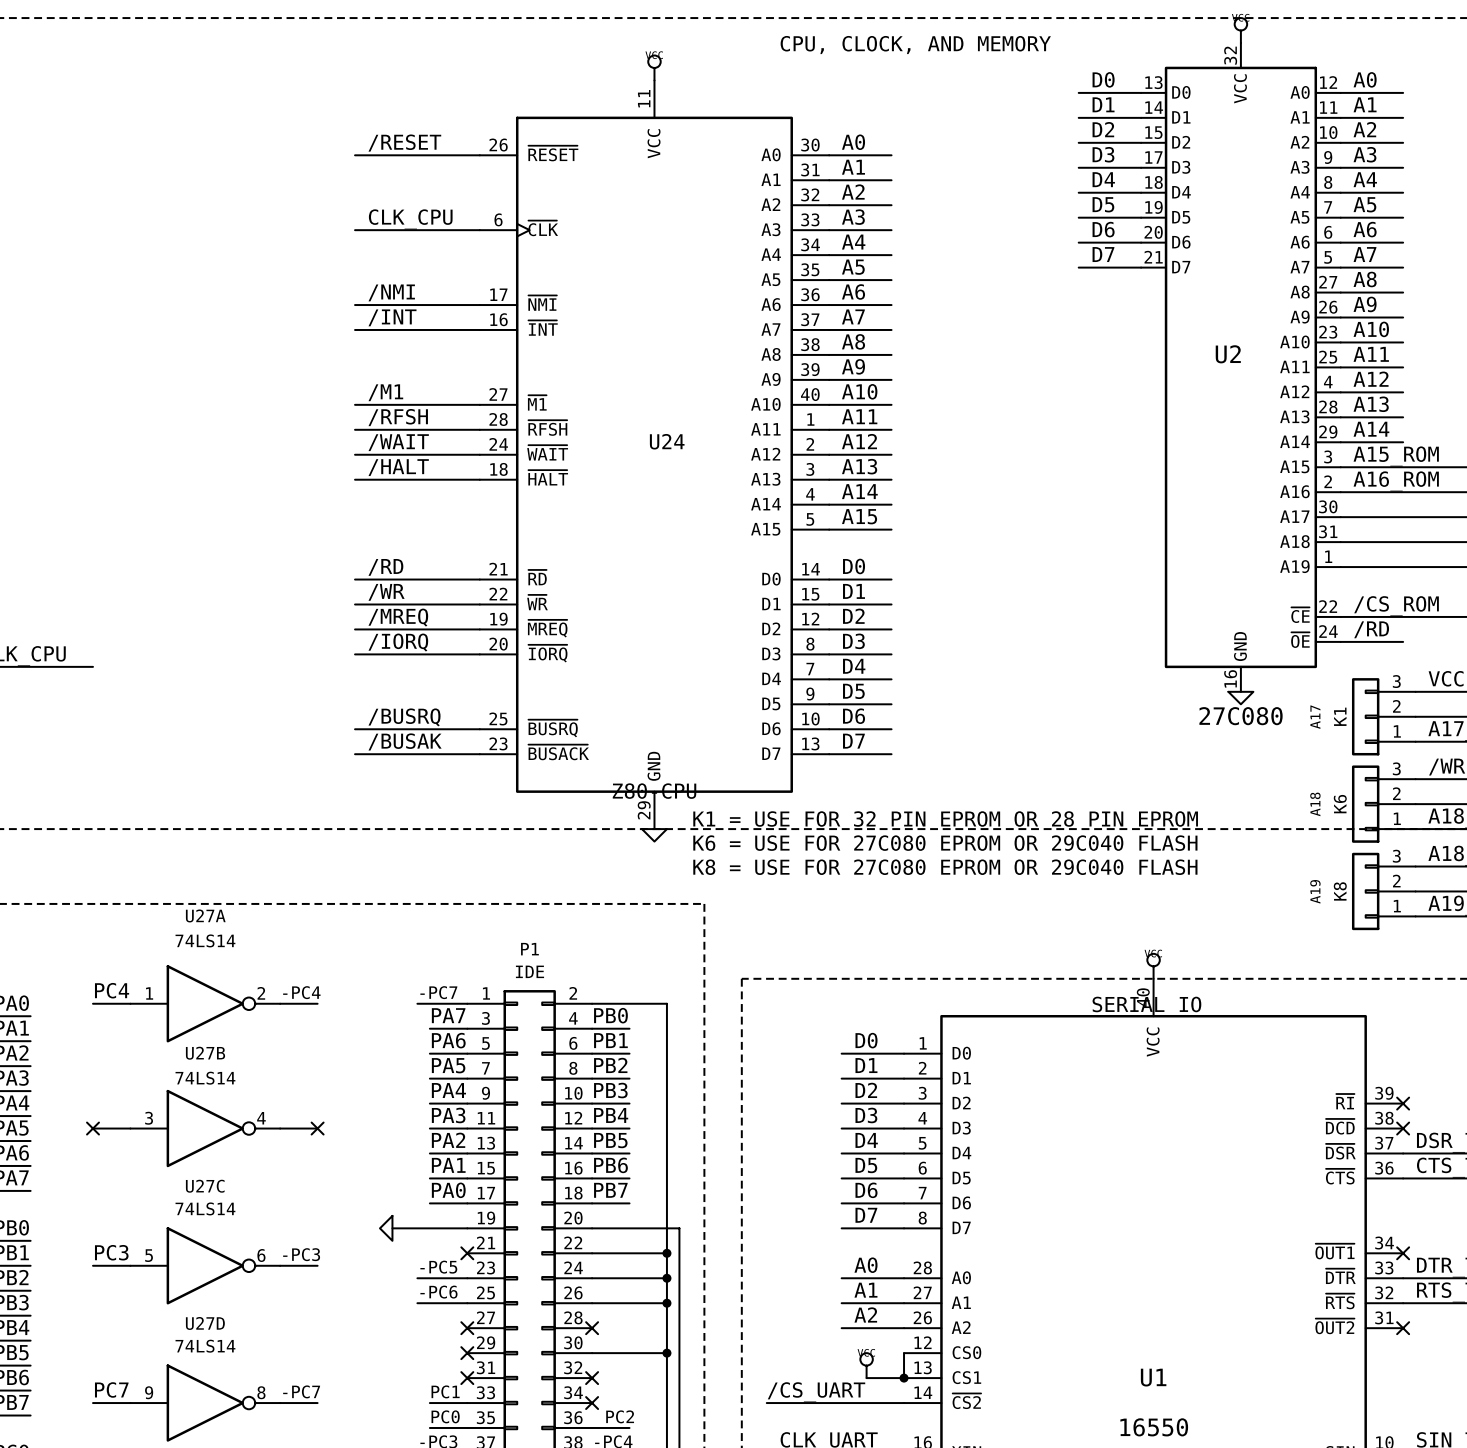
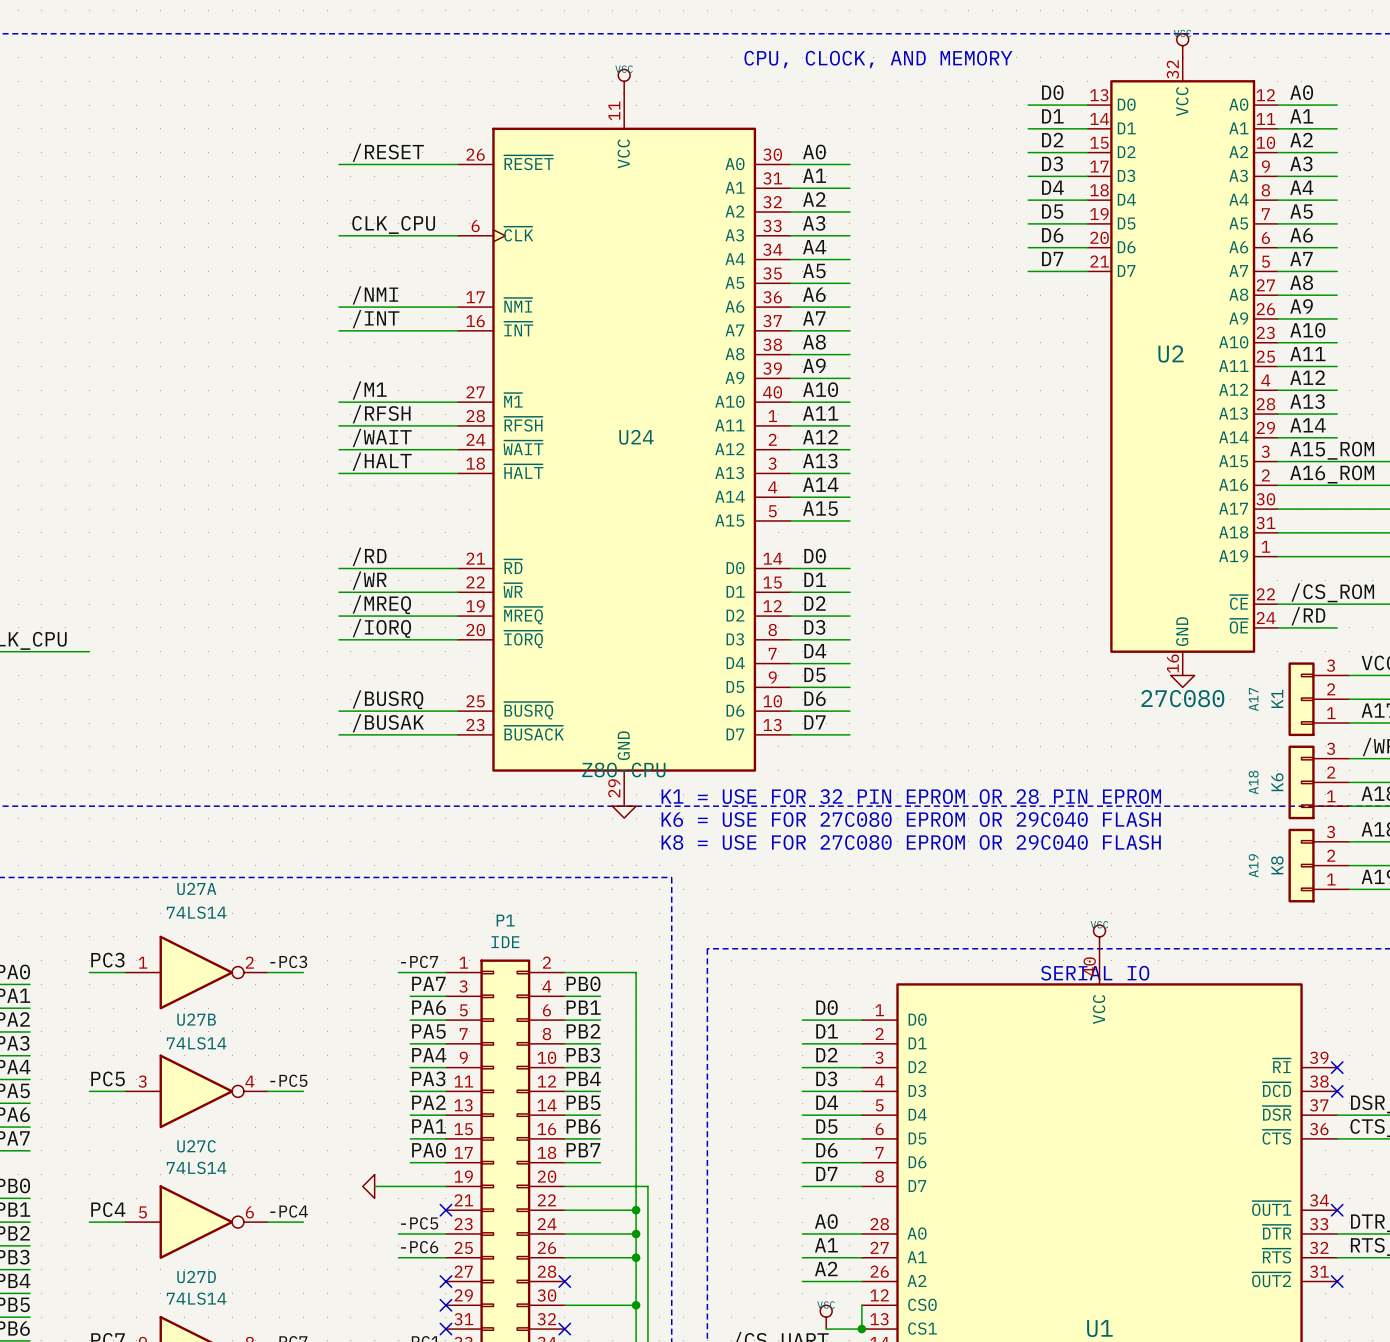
label: PC4 (112, 990) -> PC3 (107, 960)
label: -PC4 (301, 992) -> -PC3 (288, 961)
label: none -> PC5 (108, 1078)
label: none -> -PC5 (288, 1080)
no-connect mark: (93, 1128) -> none
no-connect mark: (317, 1128) -> none
label: PC3 (111, 1252) -> PC4 (108, 1209)
label: -PC3 (301, 1254) -> -PC4 (289, 1211)

